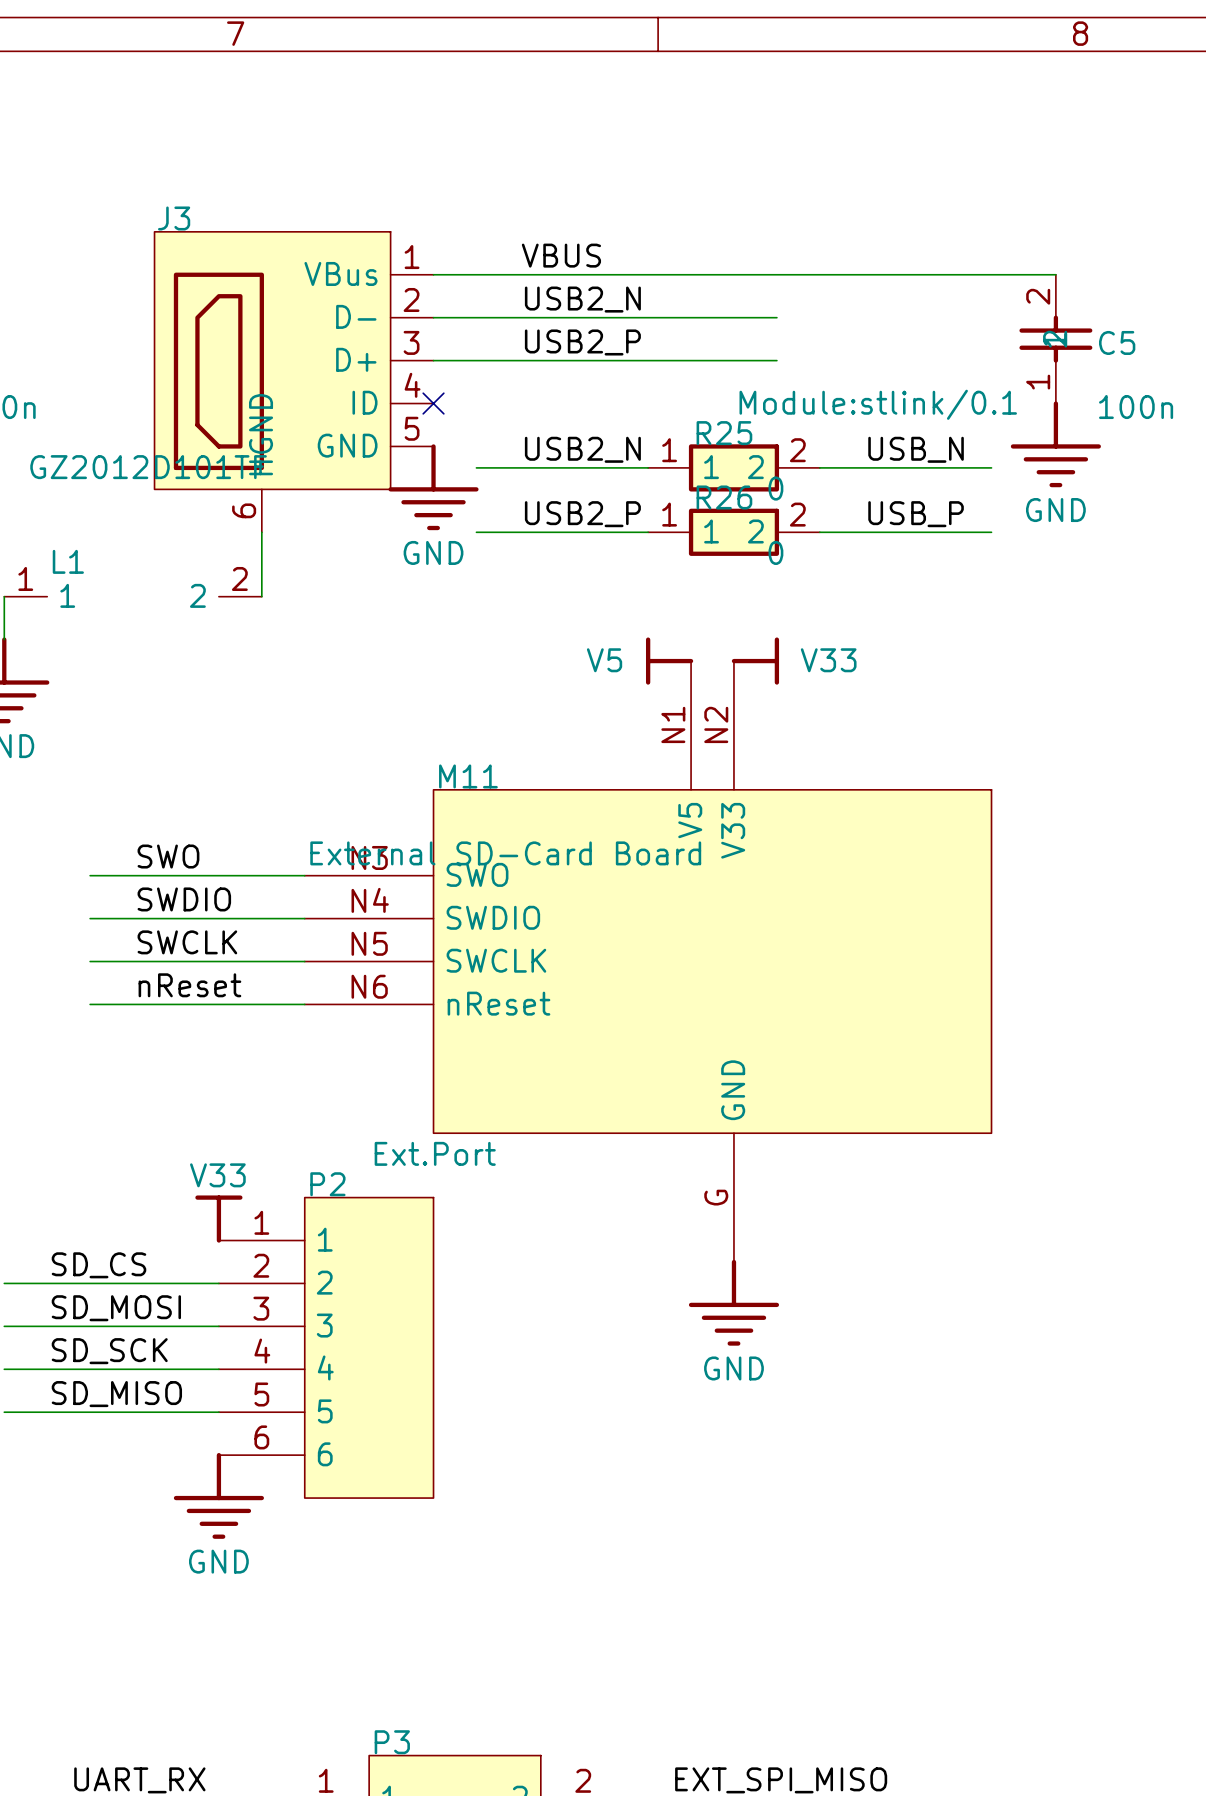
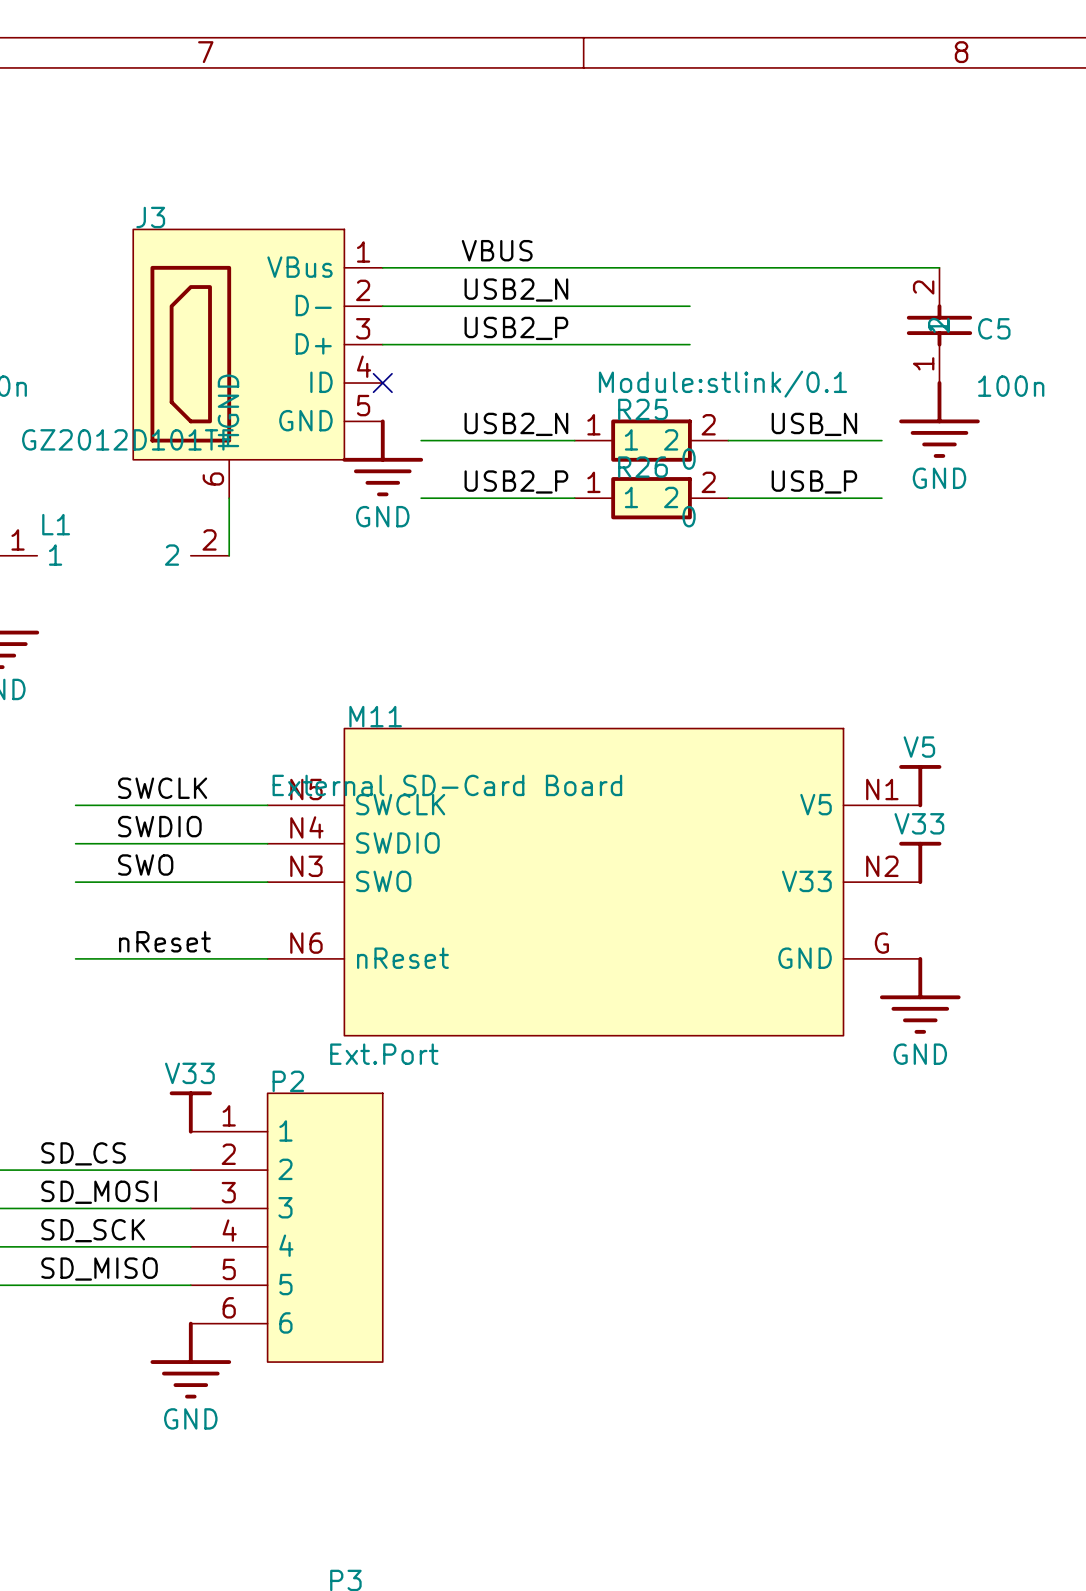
M11 text position: Module:stlink/0.1 (878, 404) -> Module:stlink/0.1 (722, 384)
power symbol text position: V33 (828, 660) -> V33 (919, 823)
M11 symbol: [304, 661, 992, 1262] -> [267, 728, 921, 1036]
power symbol rotation: 0° (669, 661) -> 90° clockwise (920, 786)
power symbol position: V5 (669, 661) -> V5 (920, 786)
power symbol rotation: 0° (755, 661) -> 90° counterclockwise (920, 862)
power symbol position: V33 (755, 661) -> V33 (920, 862)
M11 name position: M11 (468, 776) -> M11 (375, 716)
label: SWO (168, 856) -> SWCLK (162, 788)
label: SWCLK (187, 942) -> SWO (145, 865)
label position: nReset (189, 985) -> nReset (164, 941)
wire: (90, 1004) (304, 1004) -> (75, 958) (267, 958)
power symbol position: GND (733, 1302) -> GND (920, 995)

